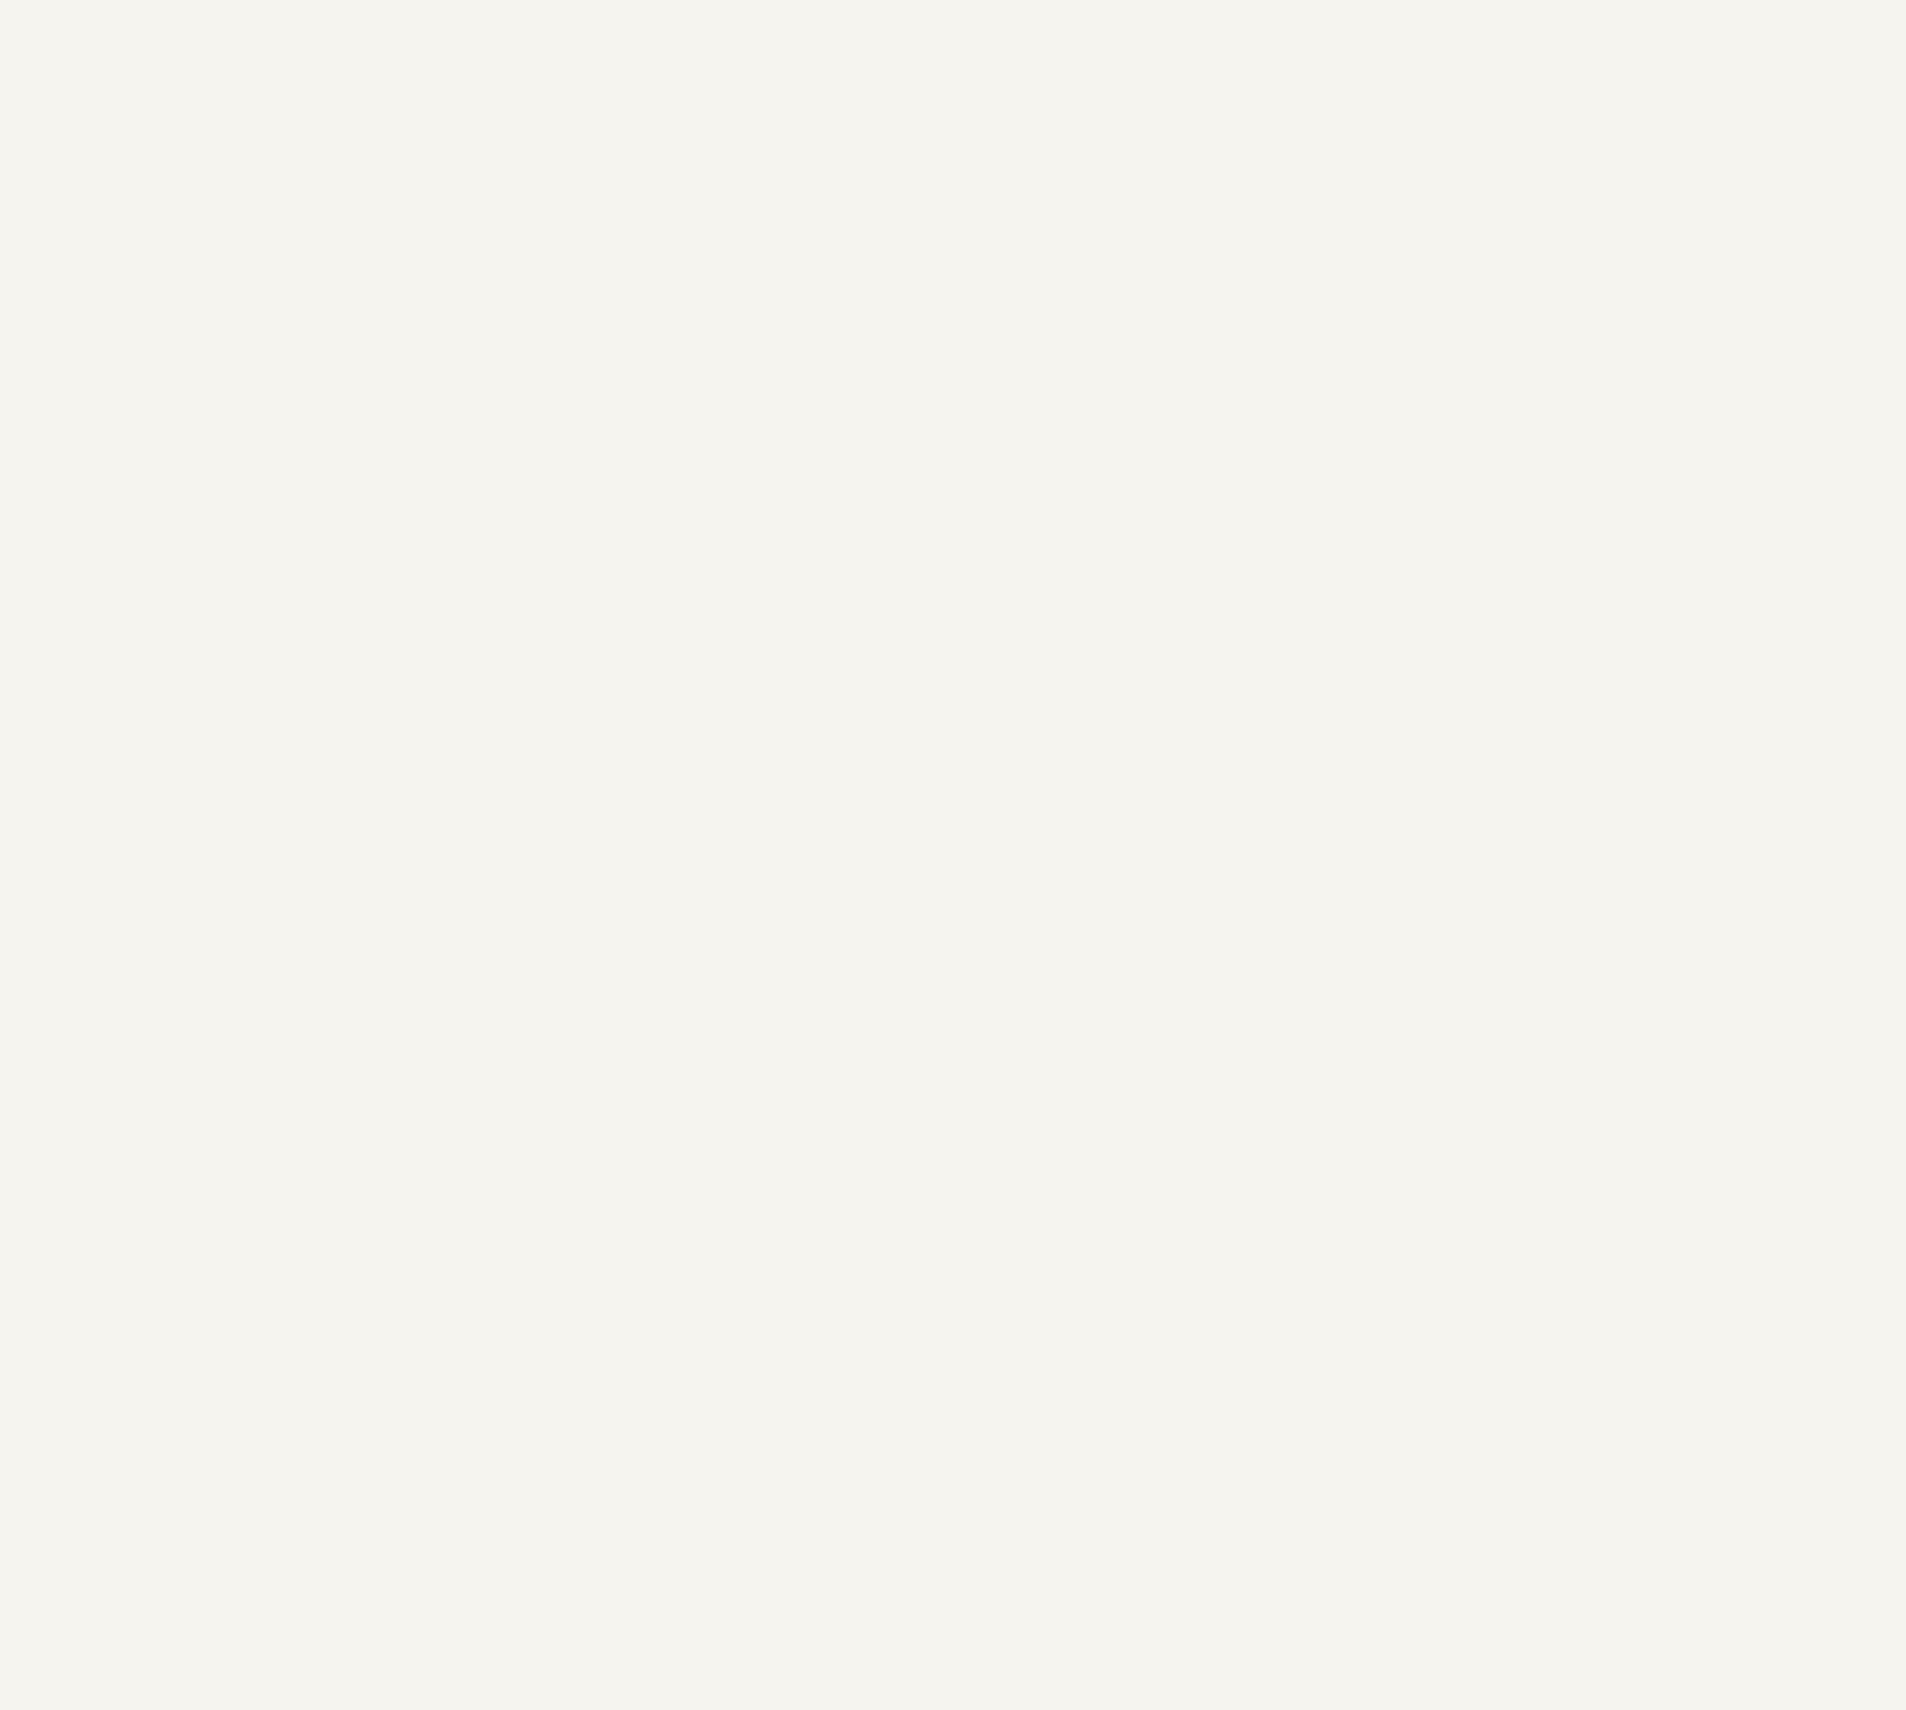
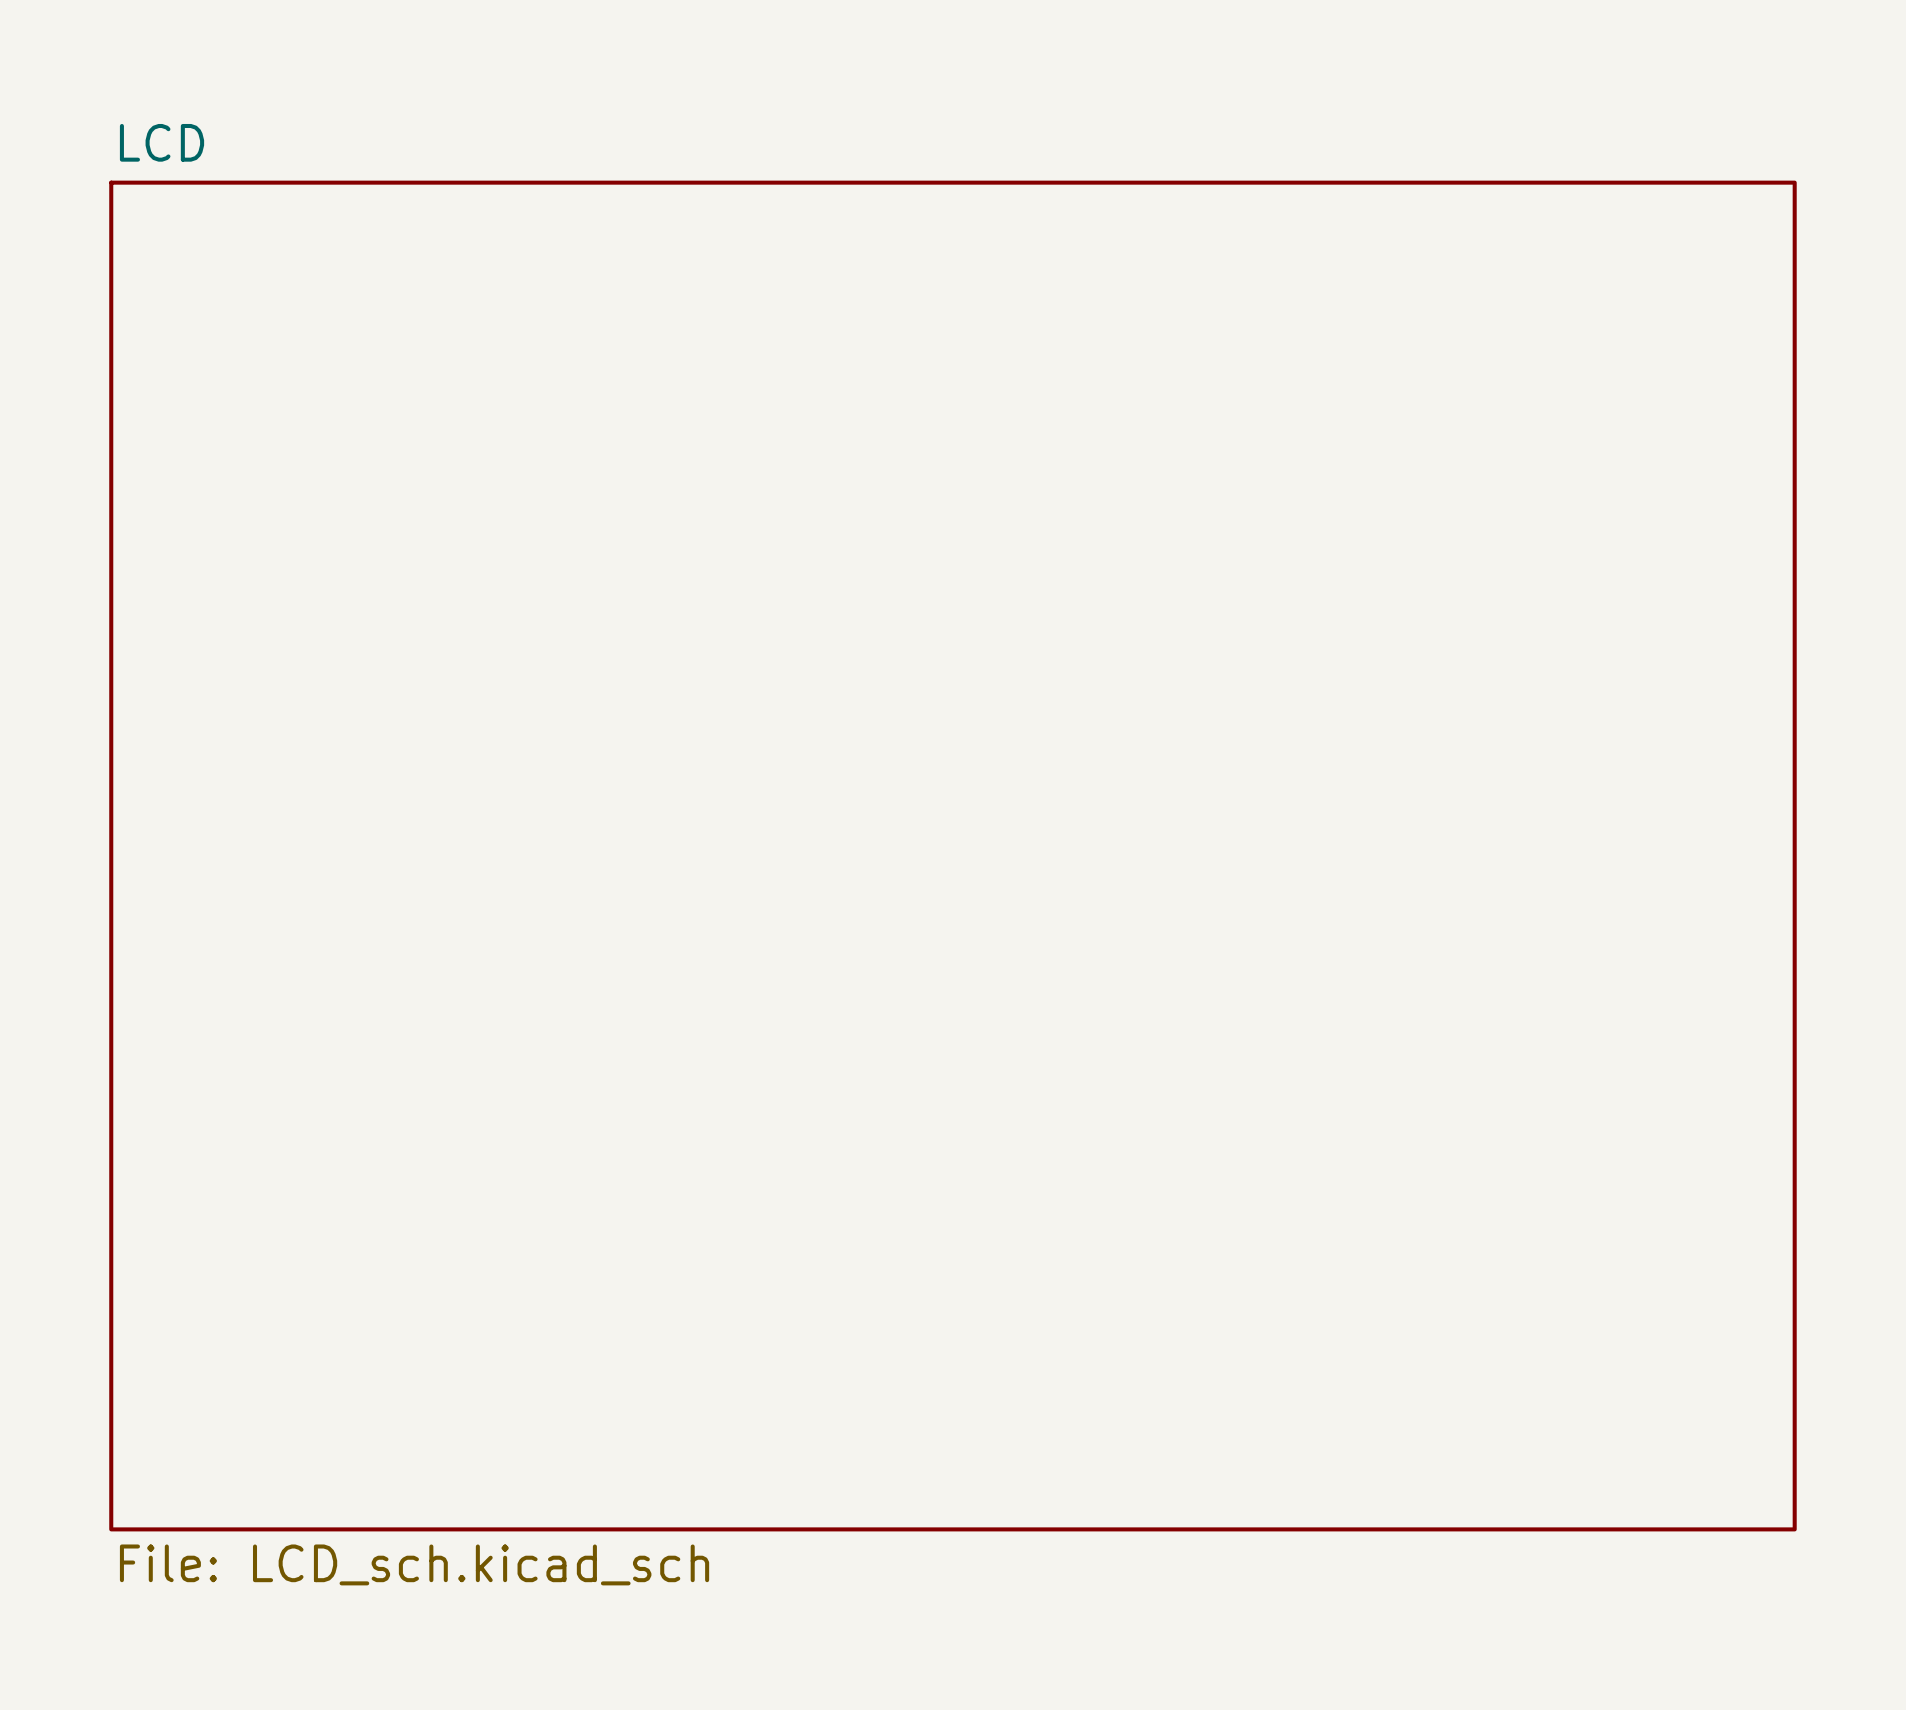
sheet LCD: none -> File: LCD_sch.kicad_sch (952, 856)

